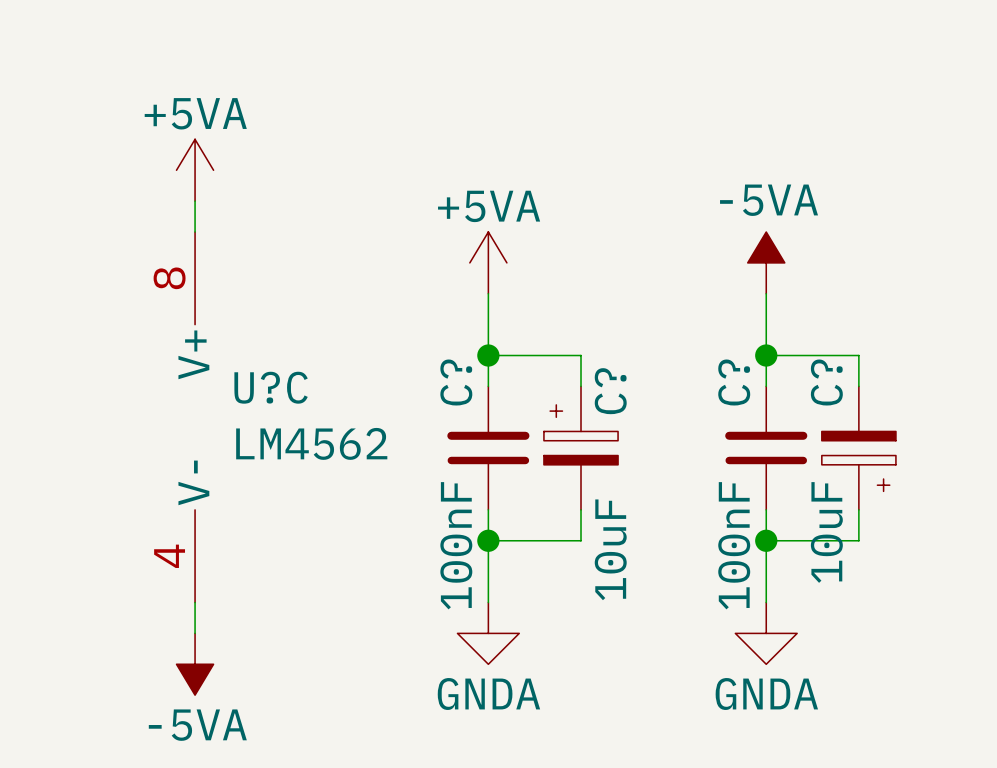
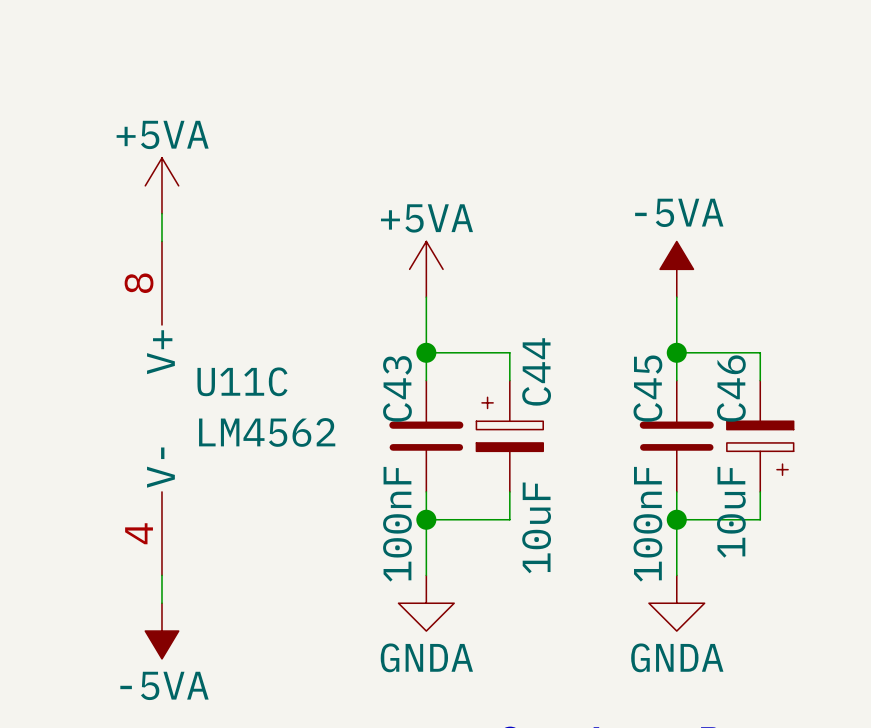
C? name: C? (456, 382) -> C43 (397, 388)
C? name: C? (734, 382) -> C45 (647, 388)
C? name: C? (826, 382) -> C46 (731, 388)
U?C name: U?C (271, 387) -> U11C (242, 381)
C? name: C? (610, 391) -> C44 (536, 371)

